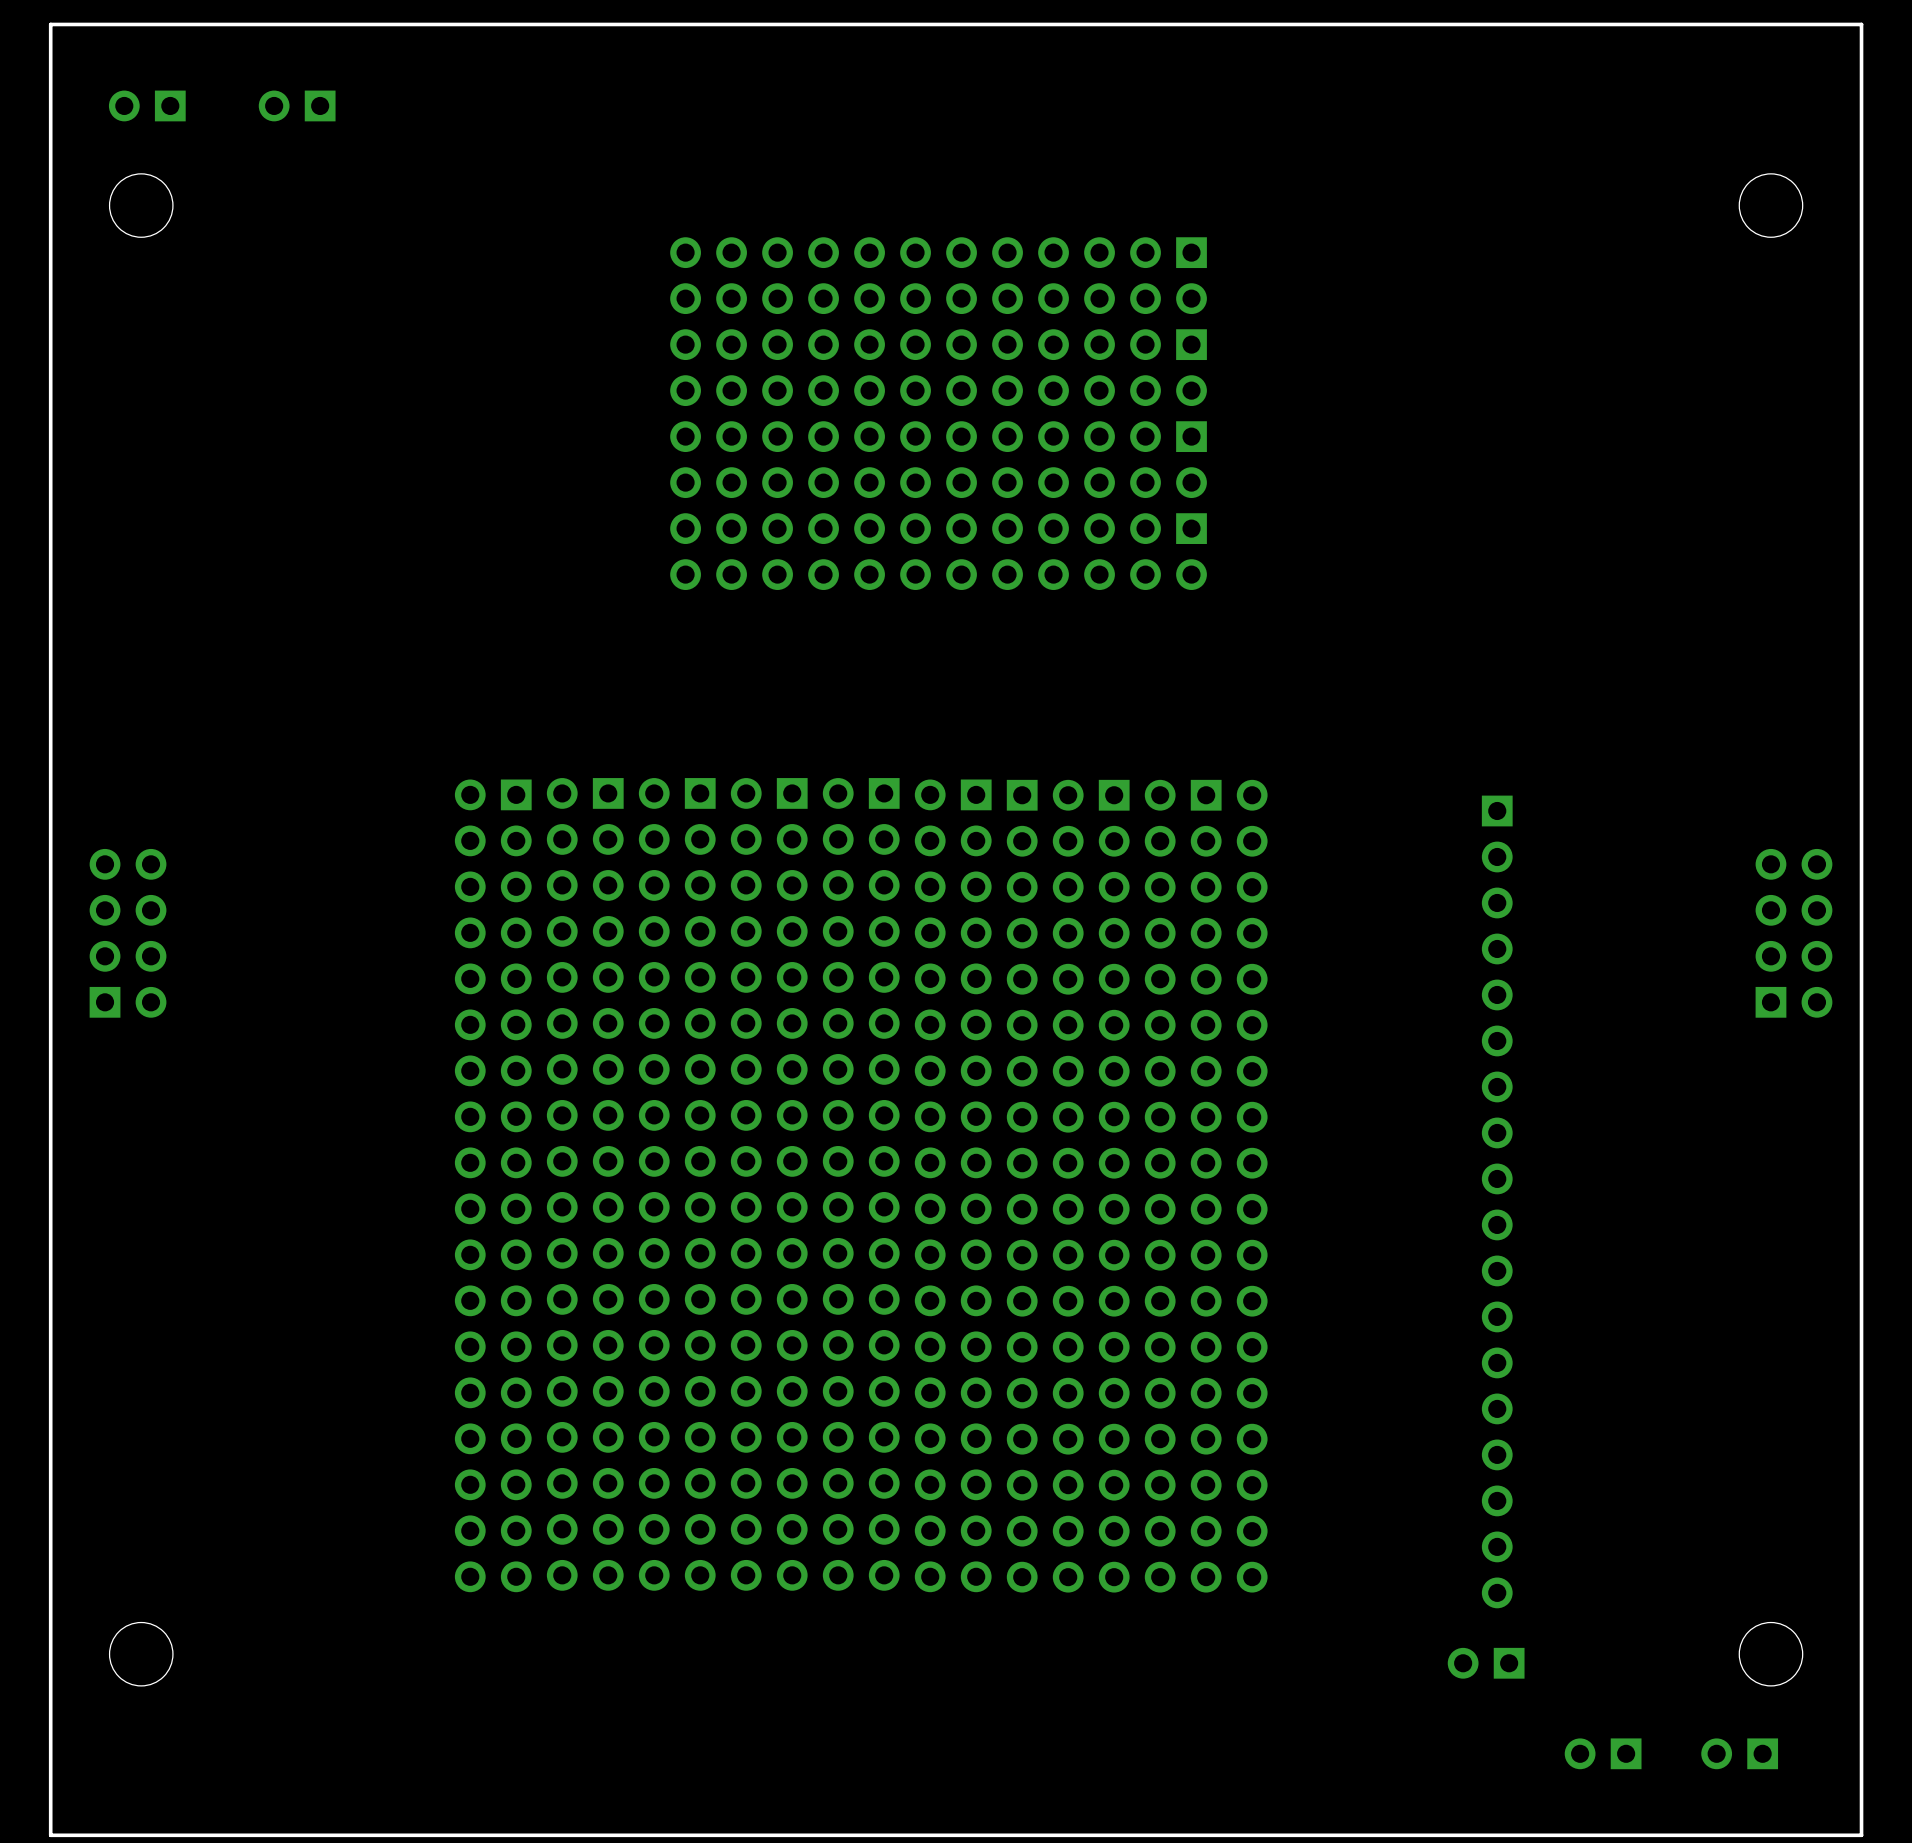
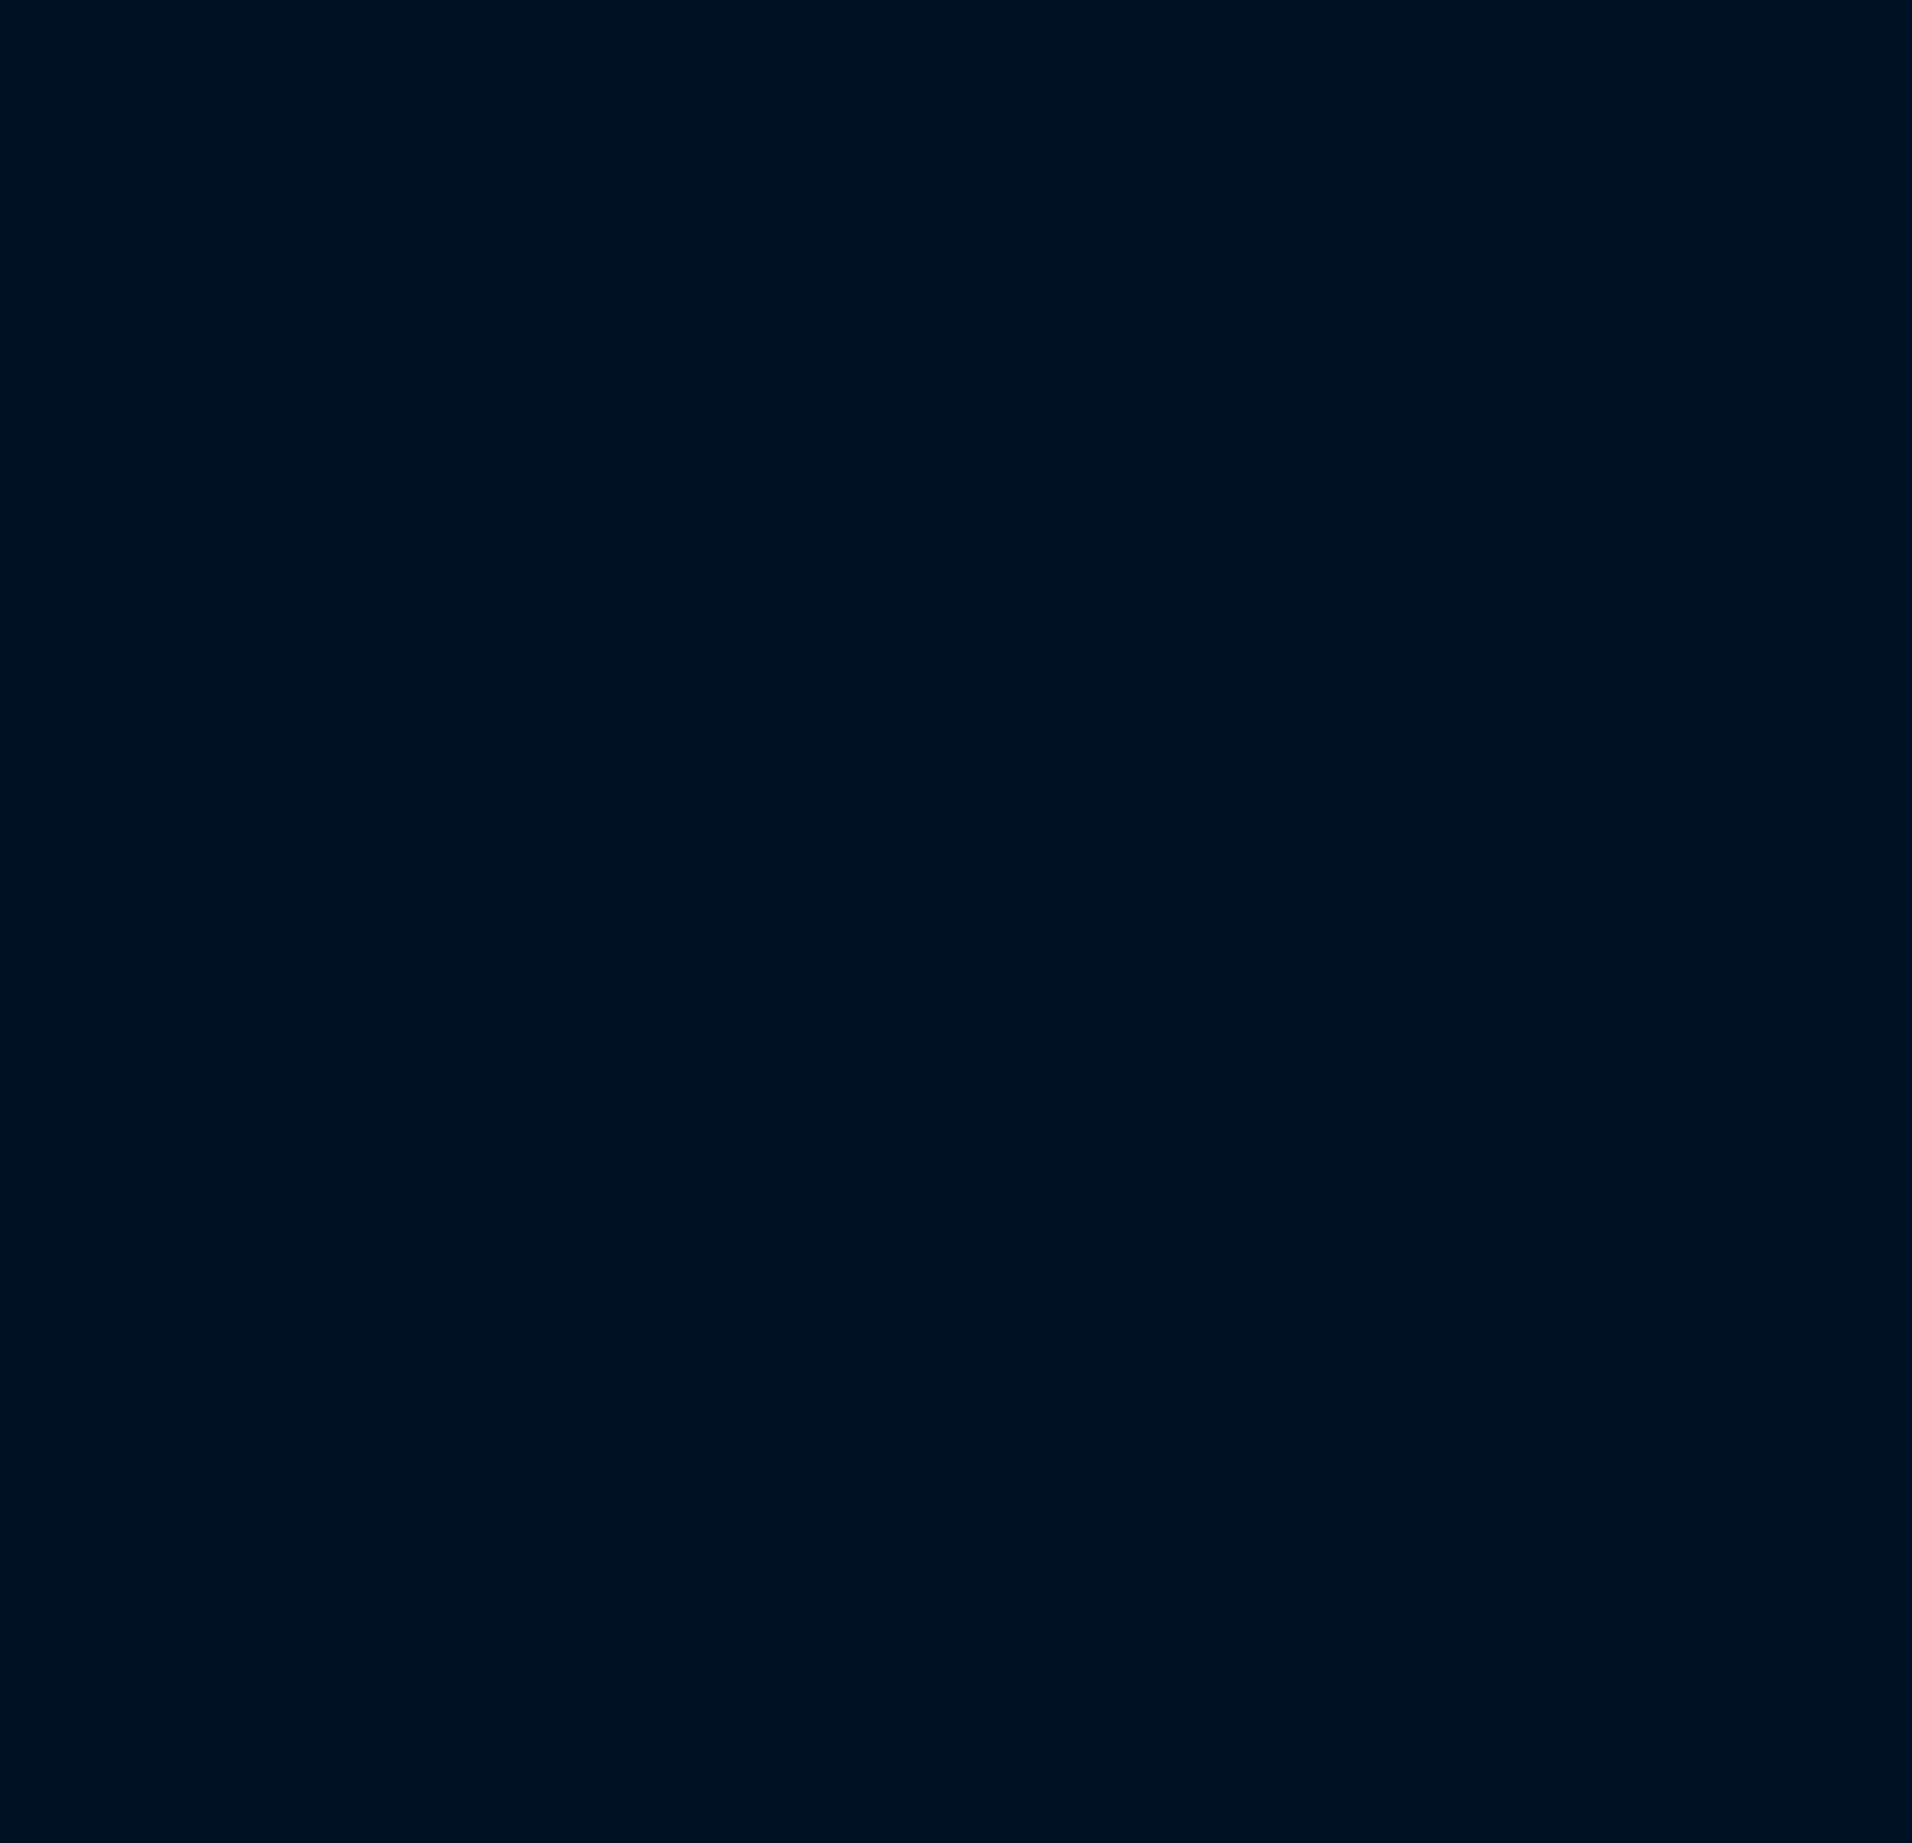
board edge: (1861, 24) (50, 24) (50, 1835) (1861, 1835) (1861, 24) -> none
part: (147, 105) -> none
part: (297, 105) -> none
round board edge: [109, 173, 174, 238] -> none
round board edge: [1738, 173, 1804, 238] -> none
part: (938, 275) -> none
part: (938, 367) -> none
part: (938, 459) -> none
part: (938, 551) -> none
part: (128, 933) -> none
part: (1793, 933) -> none
part: (585, 1184) -> none
part: (677, 1184) -> none
part: (769, 1184) -> none
part: (861, 1184) -> none
part: (493, 1185) -> none
part: (953, 1185) -> none
part: (1045, 1186) -> none
part: (1137, 1186) -> none
part: (1229, 1186) -> none
part: (1497, 1201) -> none
round board edge: [109, 1622, 174, 1687] -> none
round board edge: [1738, 1622, 1804, 1687] -> none
part: (1486, 1663) -> none
part: (1603, 1753) -> none
part: (1739, 1753) -> none

